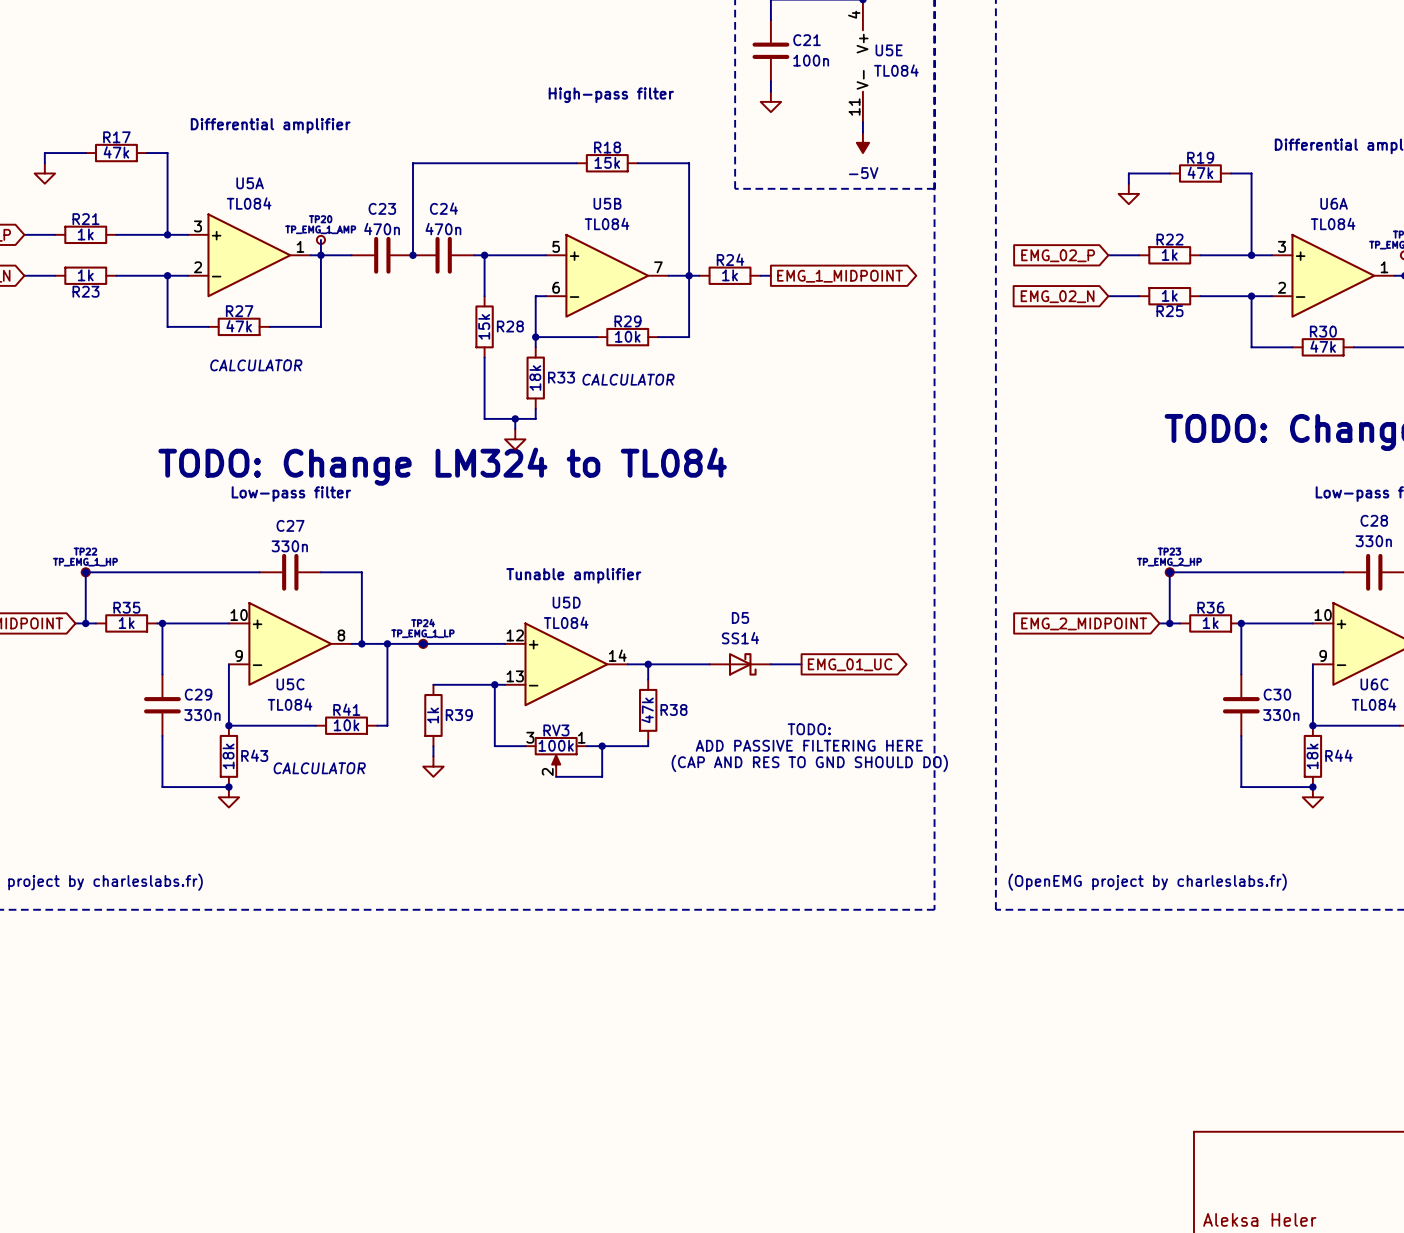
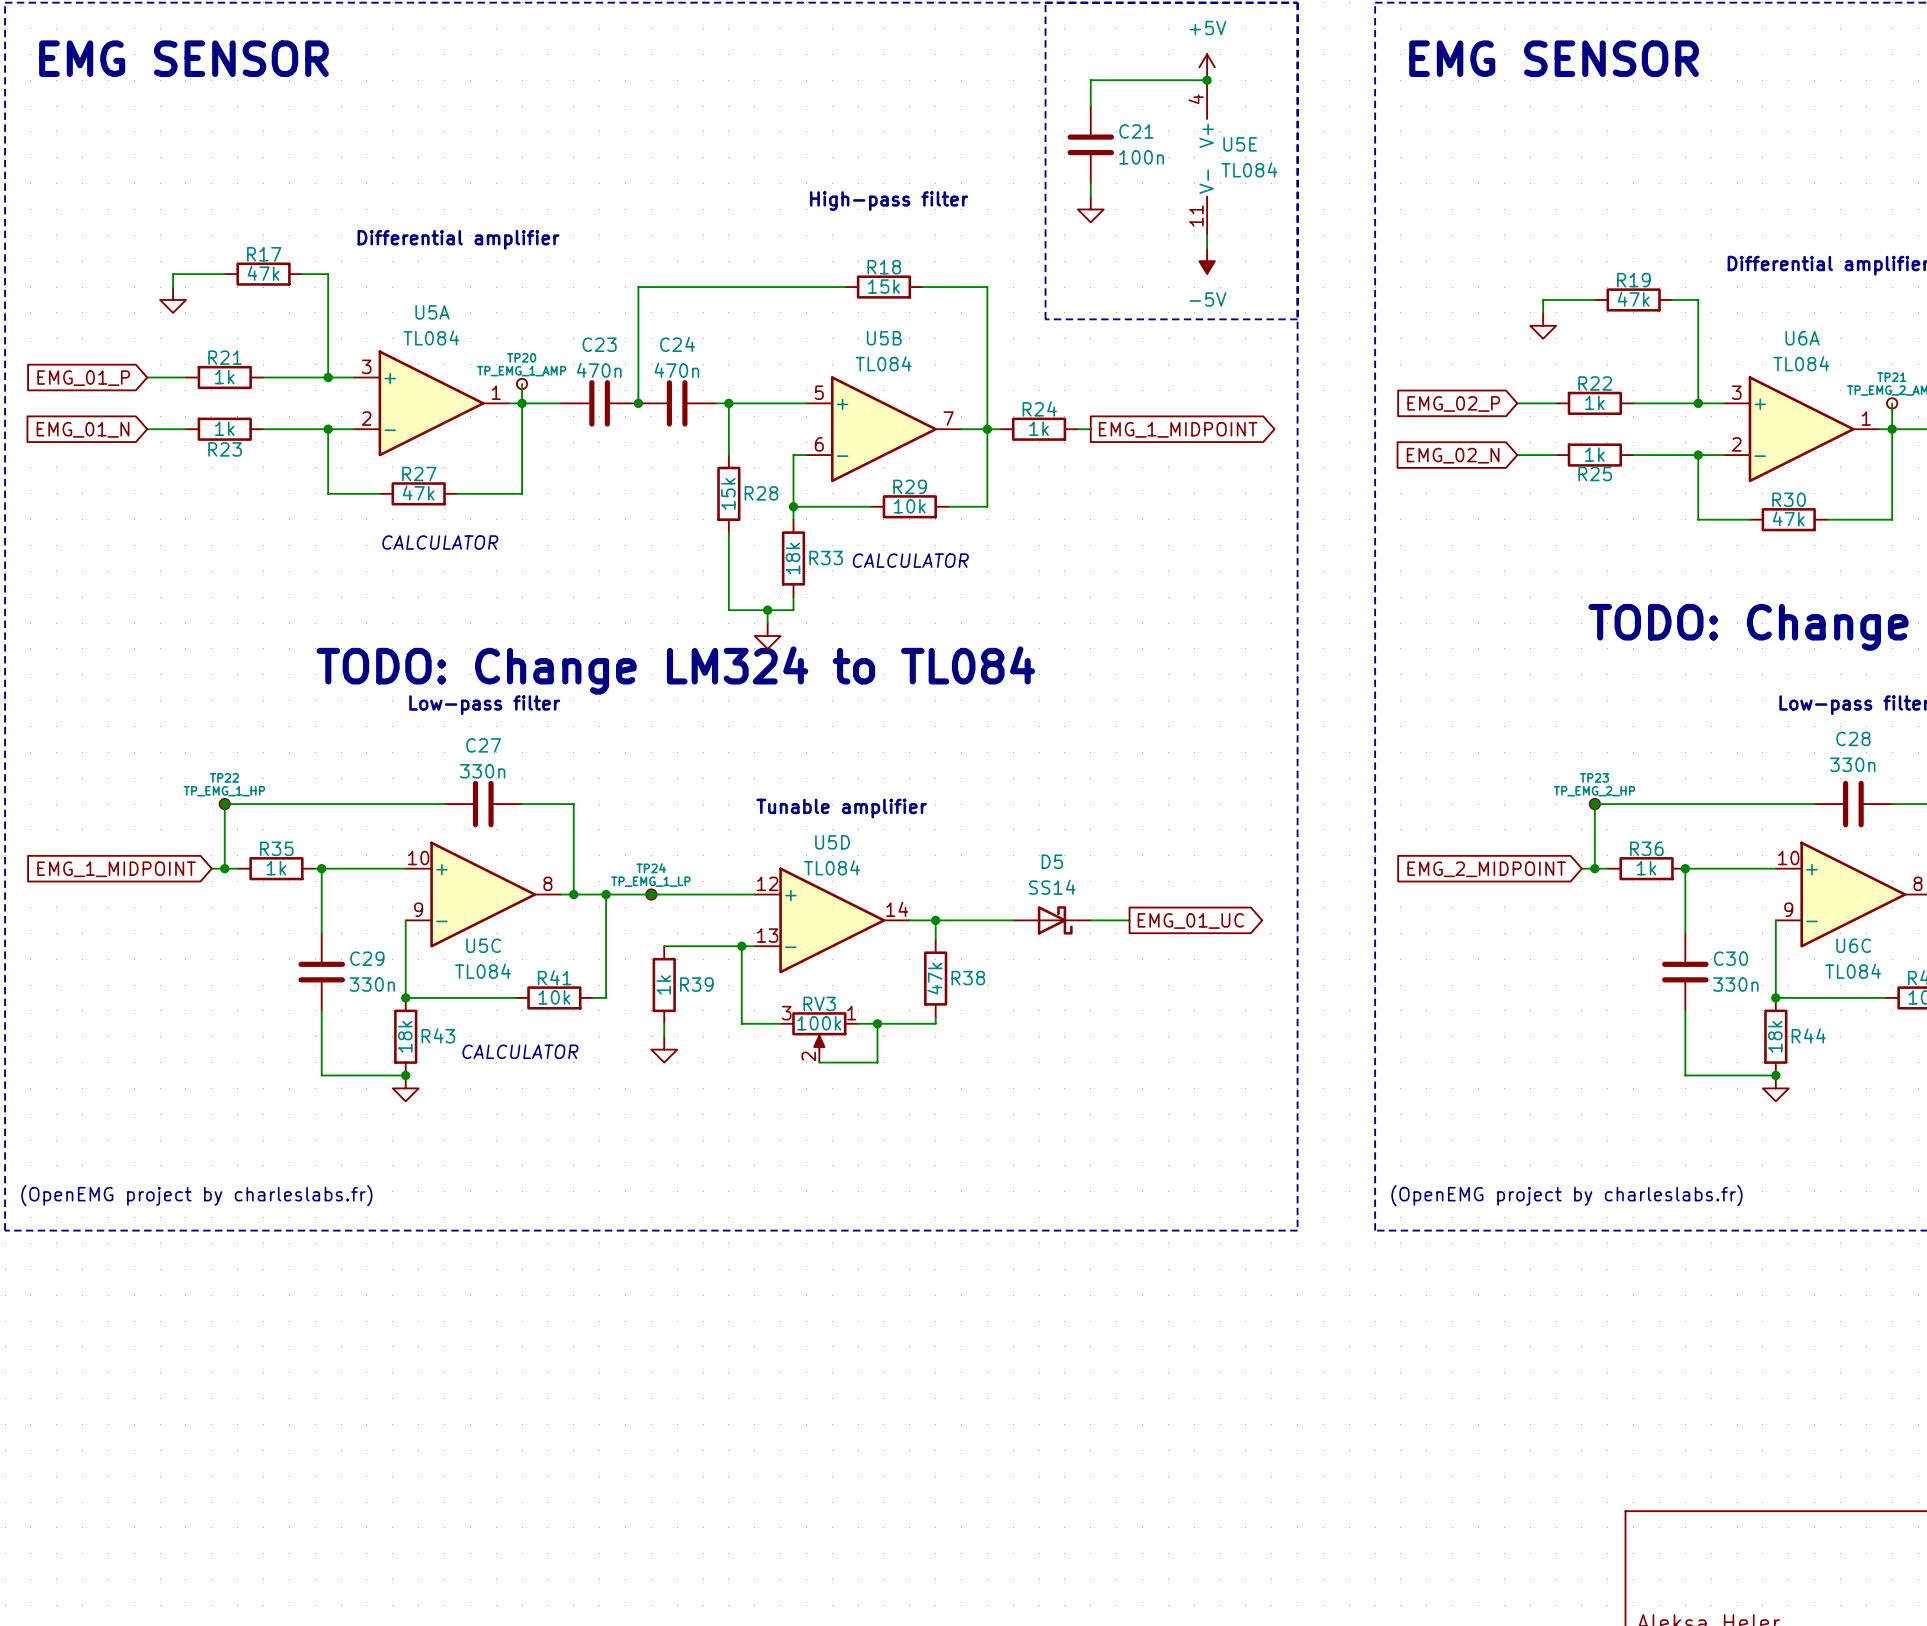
text: TODO: (809, 729) -> none
text: ADD PASSIVE FILTERING HERE (809, 745) -> none
text: (CAP AND RES TO GND SHOULD DO) (809, 763) -> none

